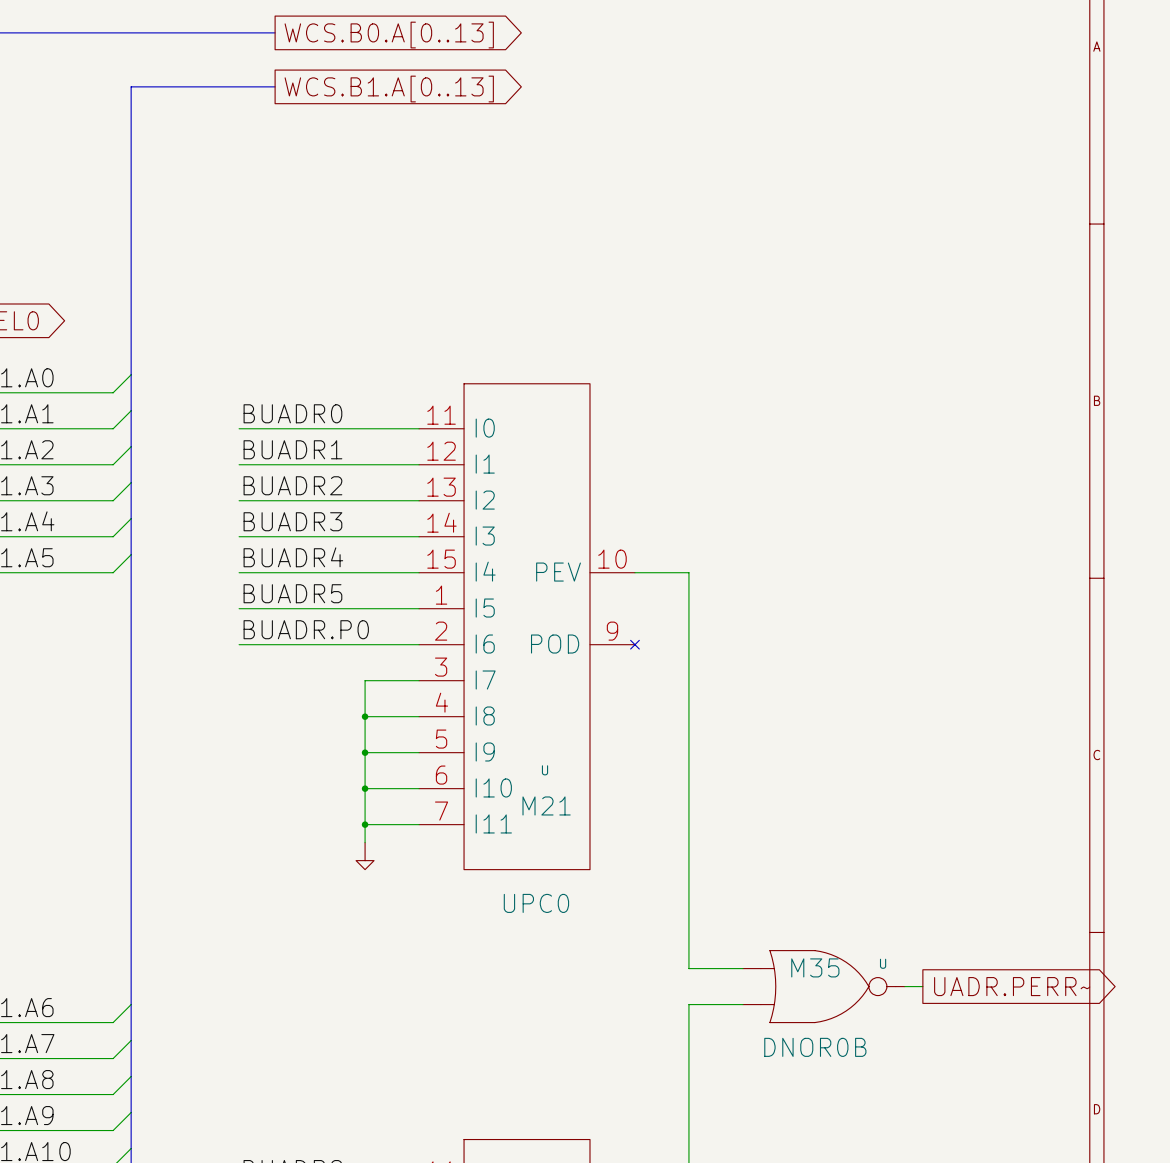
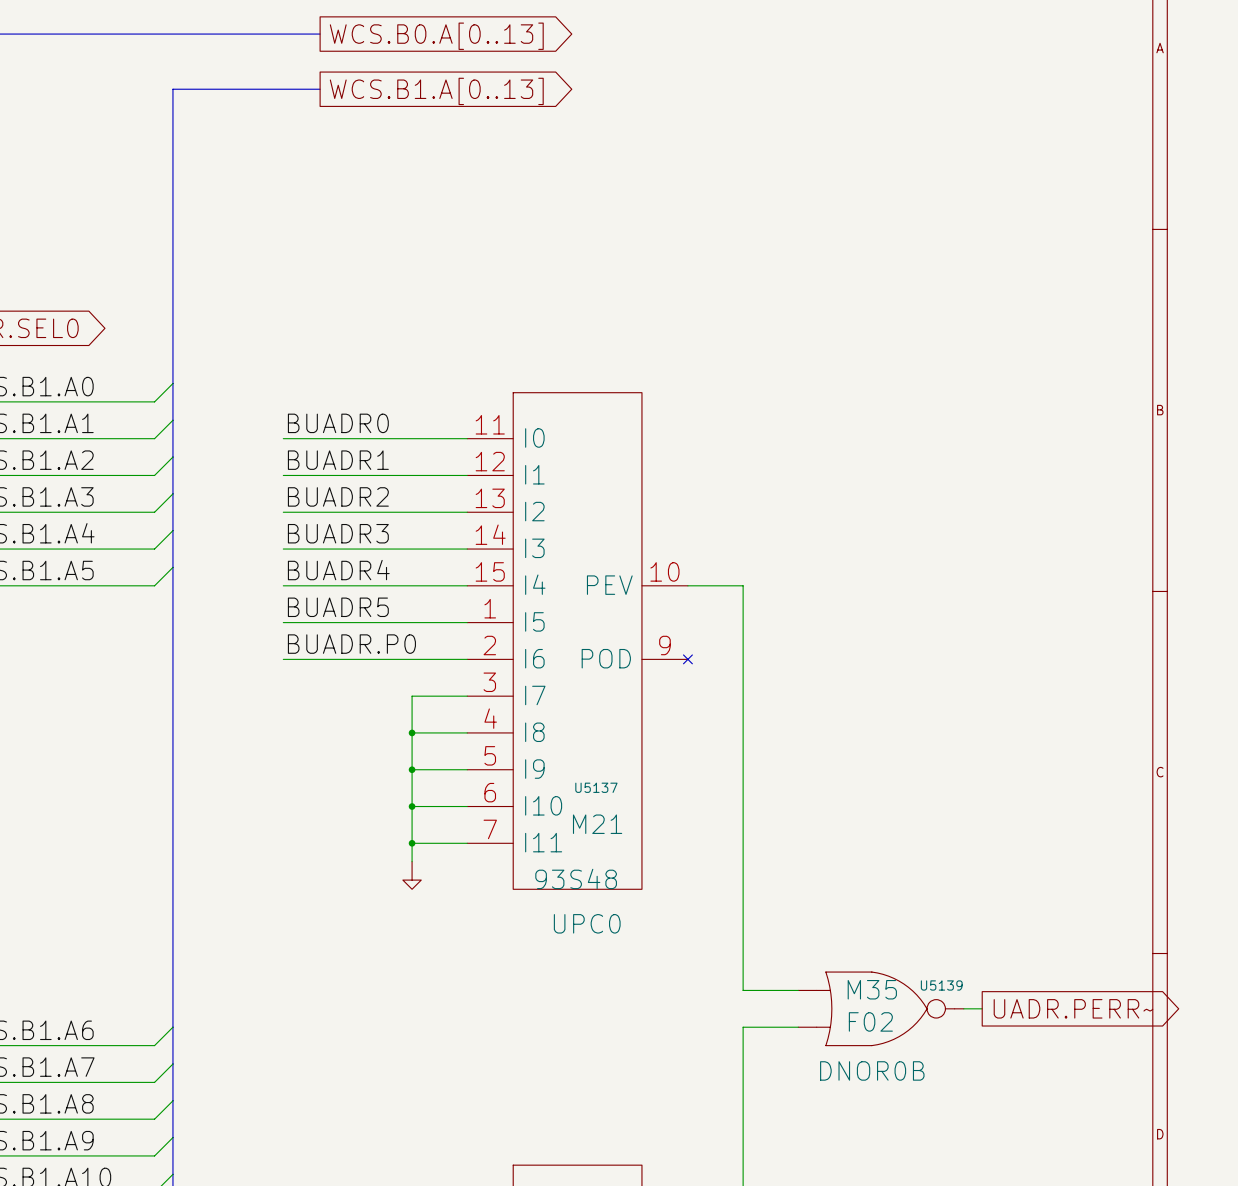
U name: U (545, 770) -> U5137 (596, 787)
U value: none -> 93S48 (576, 878)
U name: U (883, 963) -> U5139 (941, 985)
U value: none -> F02 (870, 1021)

